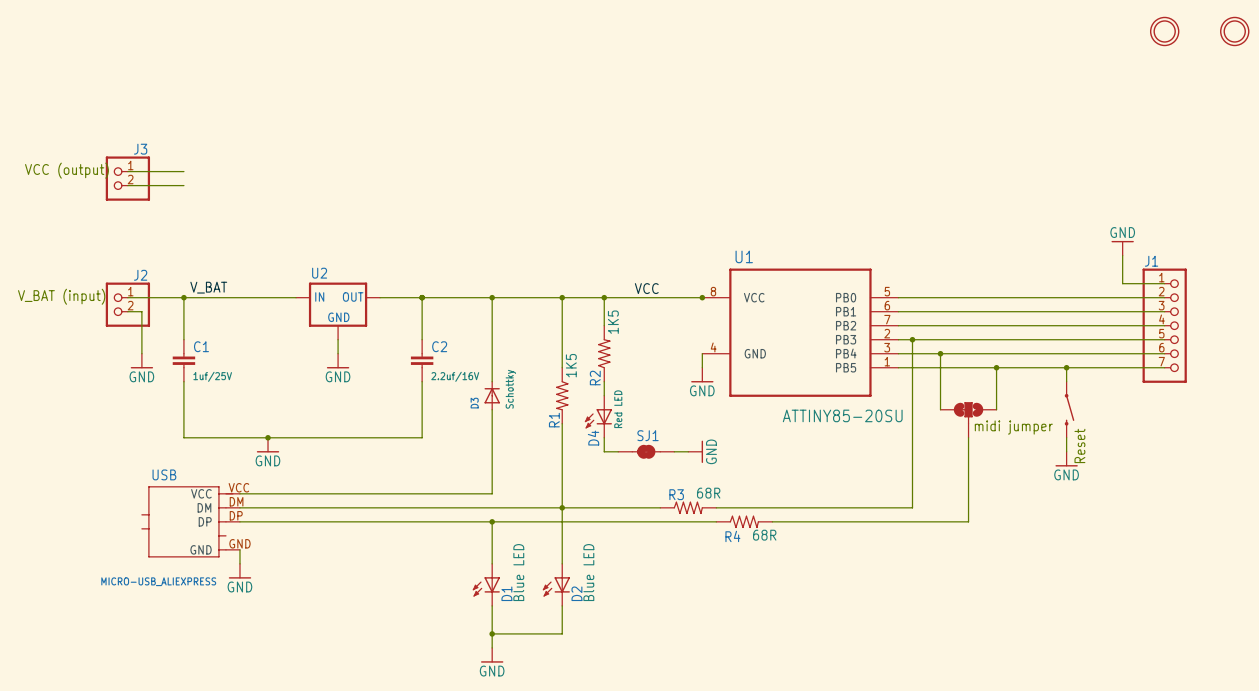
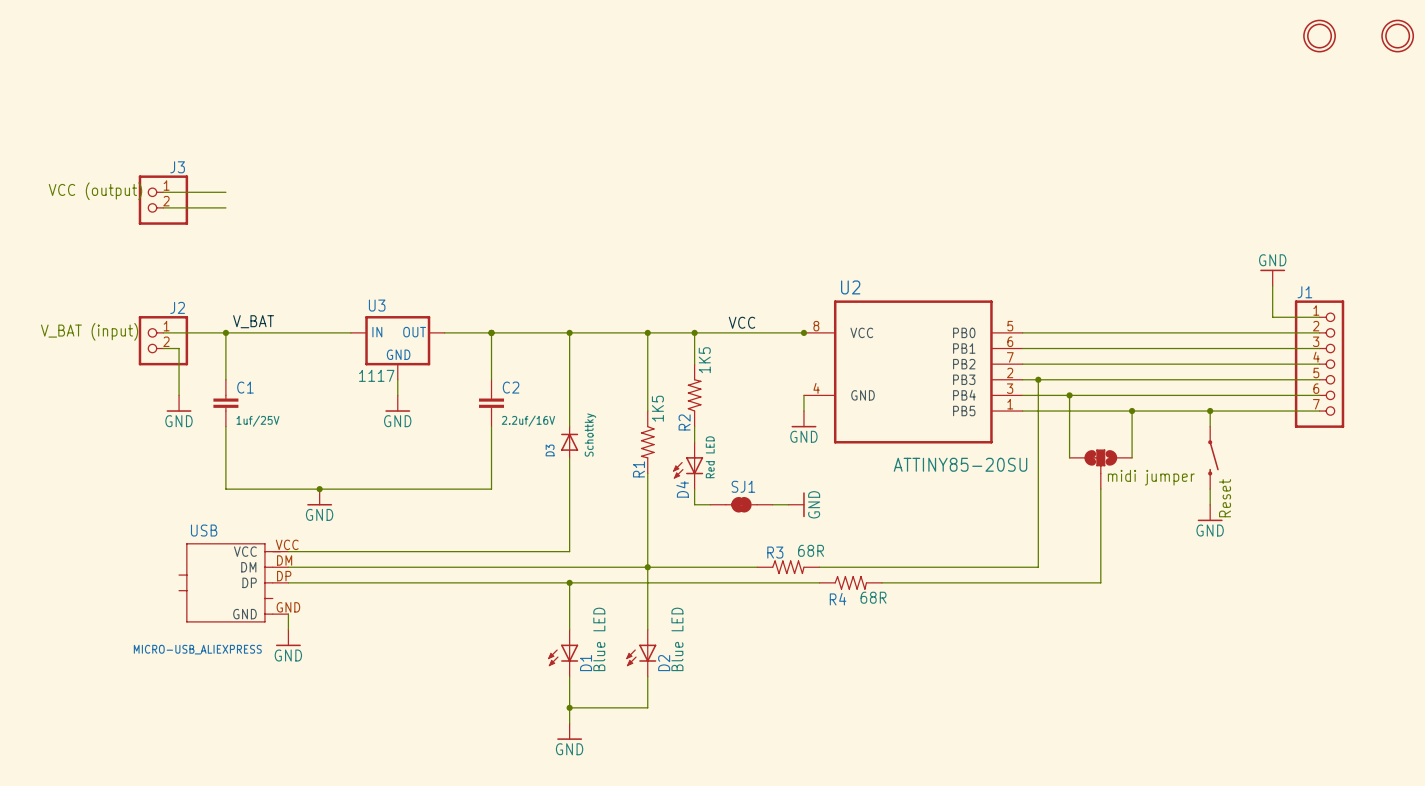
U1 name: U1 (744, 256) -> U2 (850, 287)
U2 name: U2 (319, 273) -> U3 (377, 305)
U2 value: none -> 1117 (376, 375)

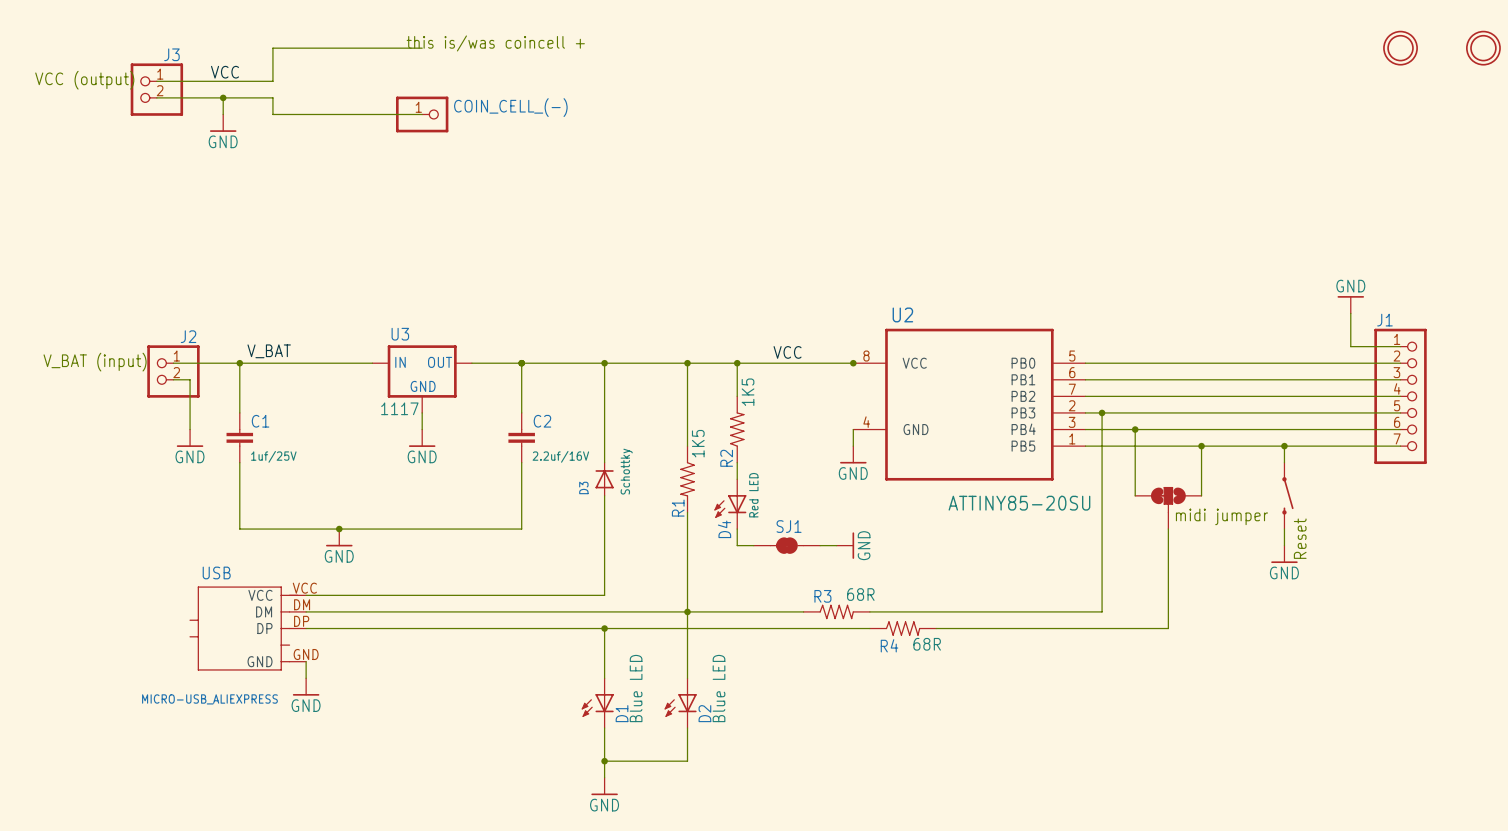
text: none -> this is/was coincell + (495, 43)
wire: none -> (422, 48) (272, 48) (272, 81) (156, 81)
label: none -> VCC (224, 72)
wire: none -> (156, 97) (272, 97) (272, 114) (422, 114)
wire: none -> (223, 97) (223, 114)
junction: none -> (223, 97)
COIN_CELL_(-): none -> (422, 114)
power symbol: none -> GND (223, 123)
text position: VCC (output) (95, 191) -> VCC (output) (84, 80)
wire: (163, 192) (225, 192) -> none
J3 position: (163, 200) -> (156, 89)
wire: (163, 207) (225, 207) -> none

